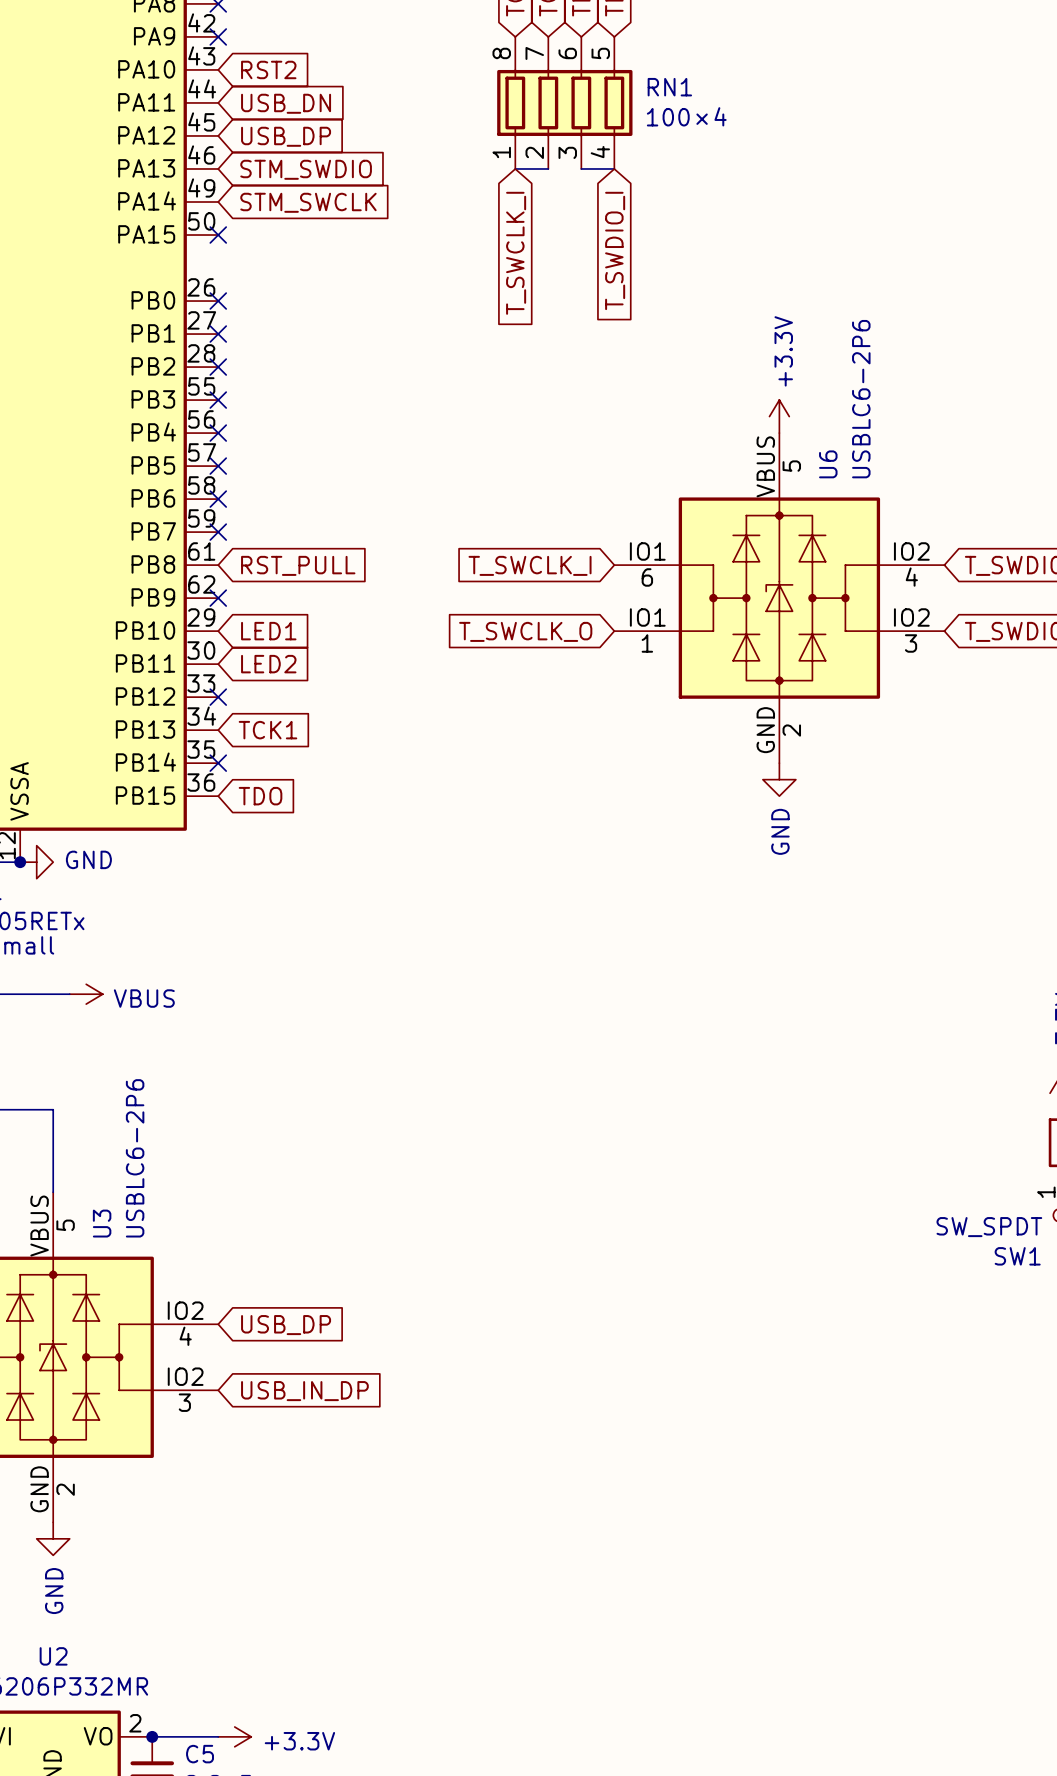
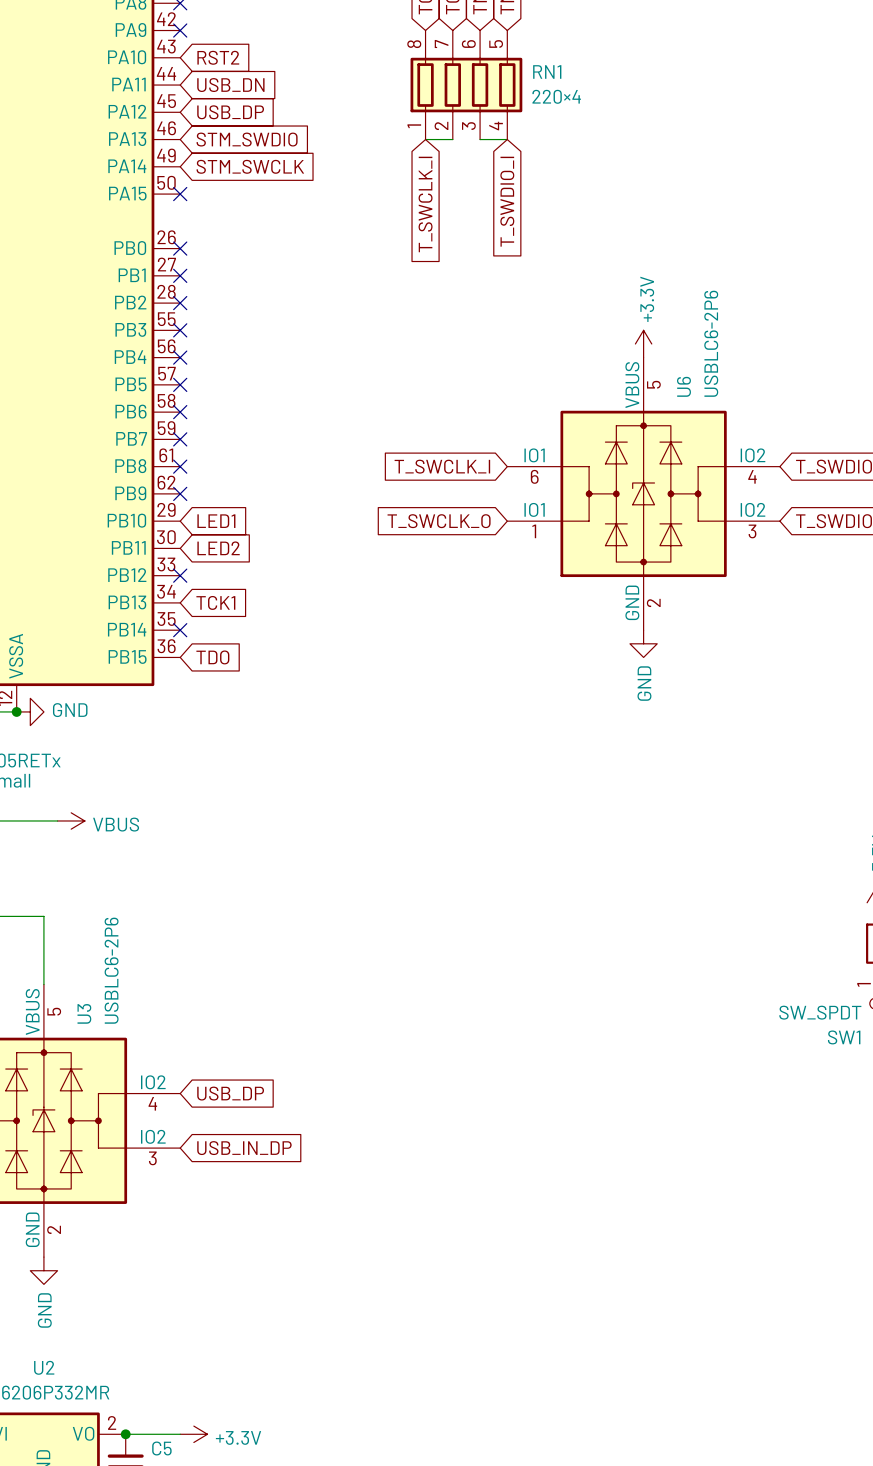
RN1 value: 100×4 (686, 116) -> 220×4 (556, 96)
no-connect mark: none -> (180, 466)
global label: RST_PULL (298, 565) -> none

